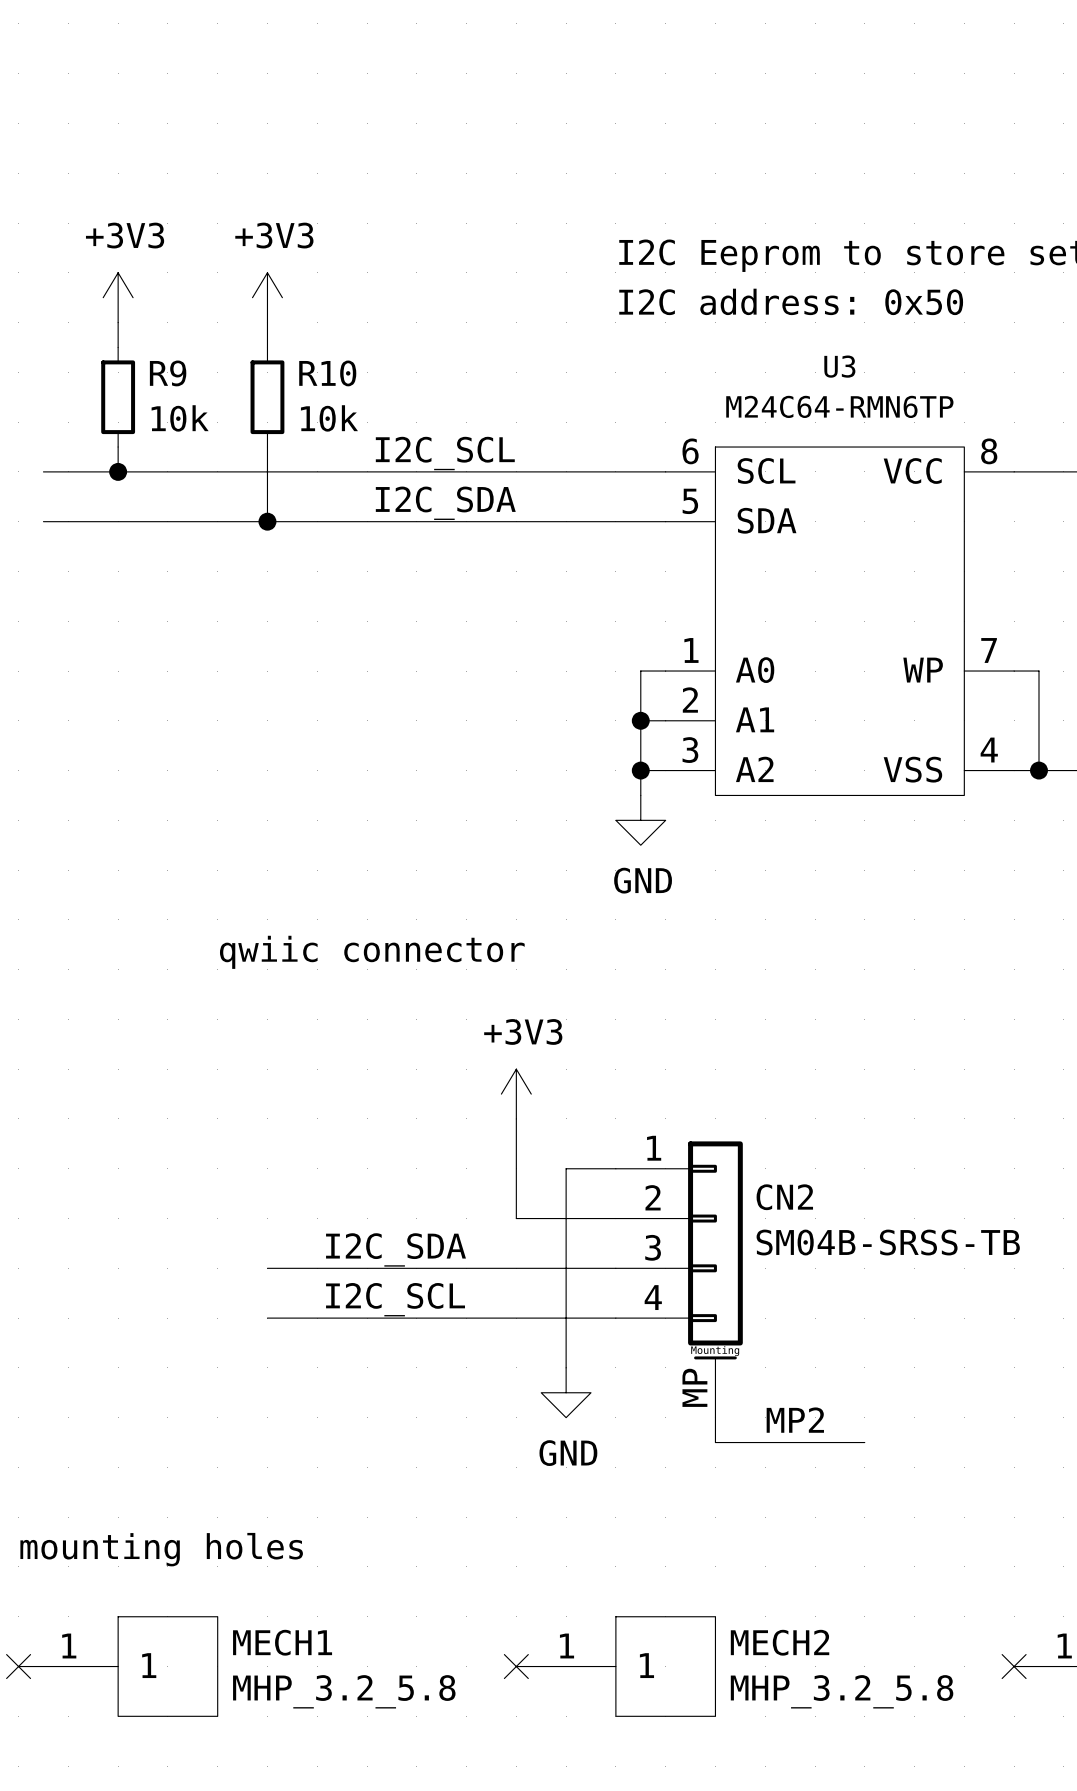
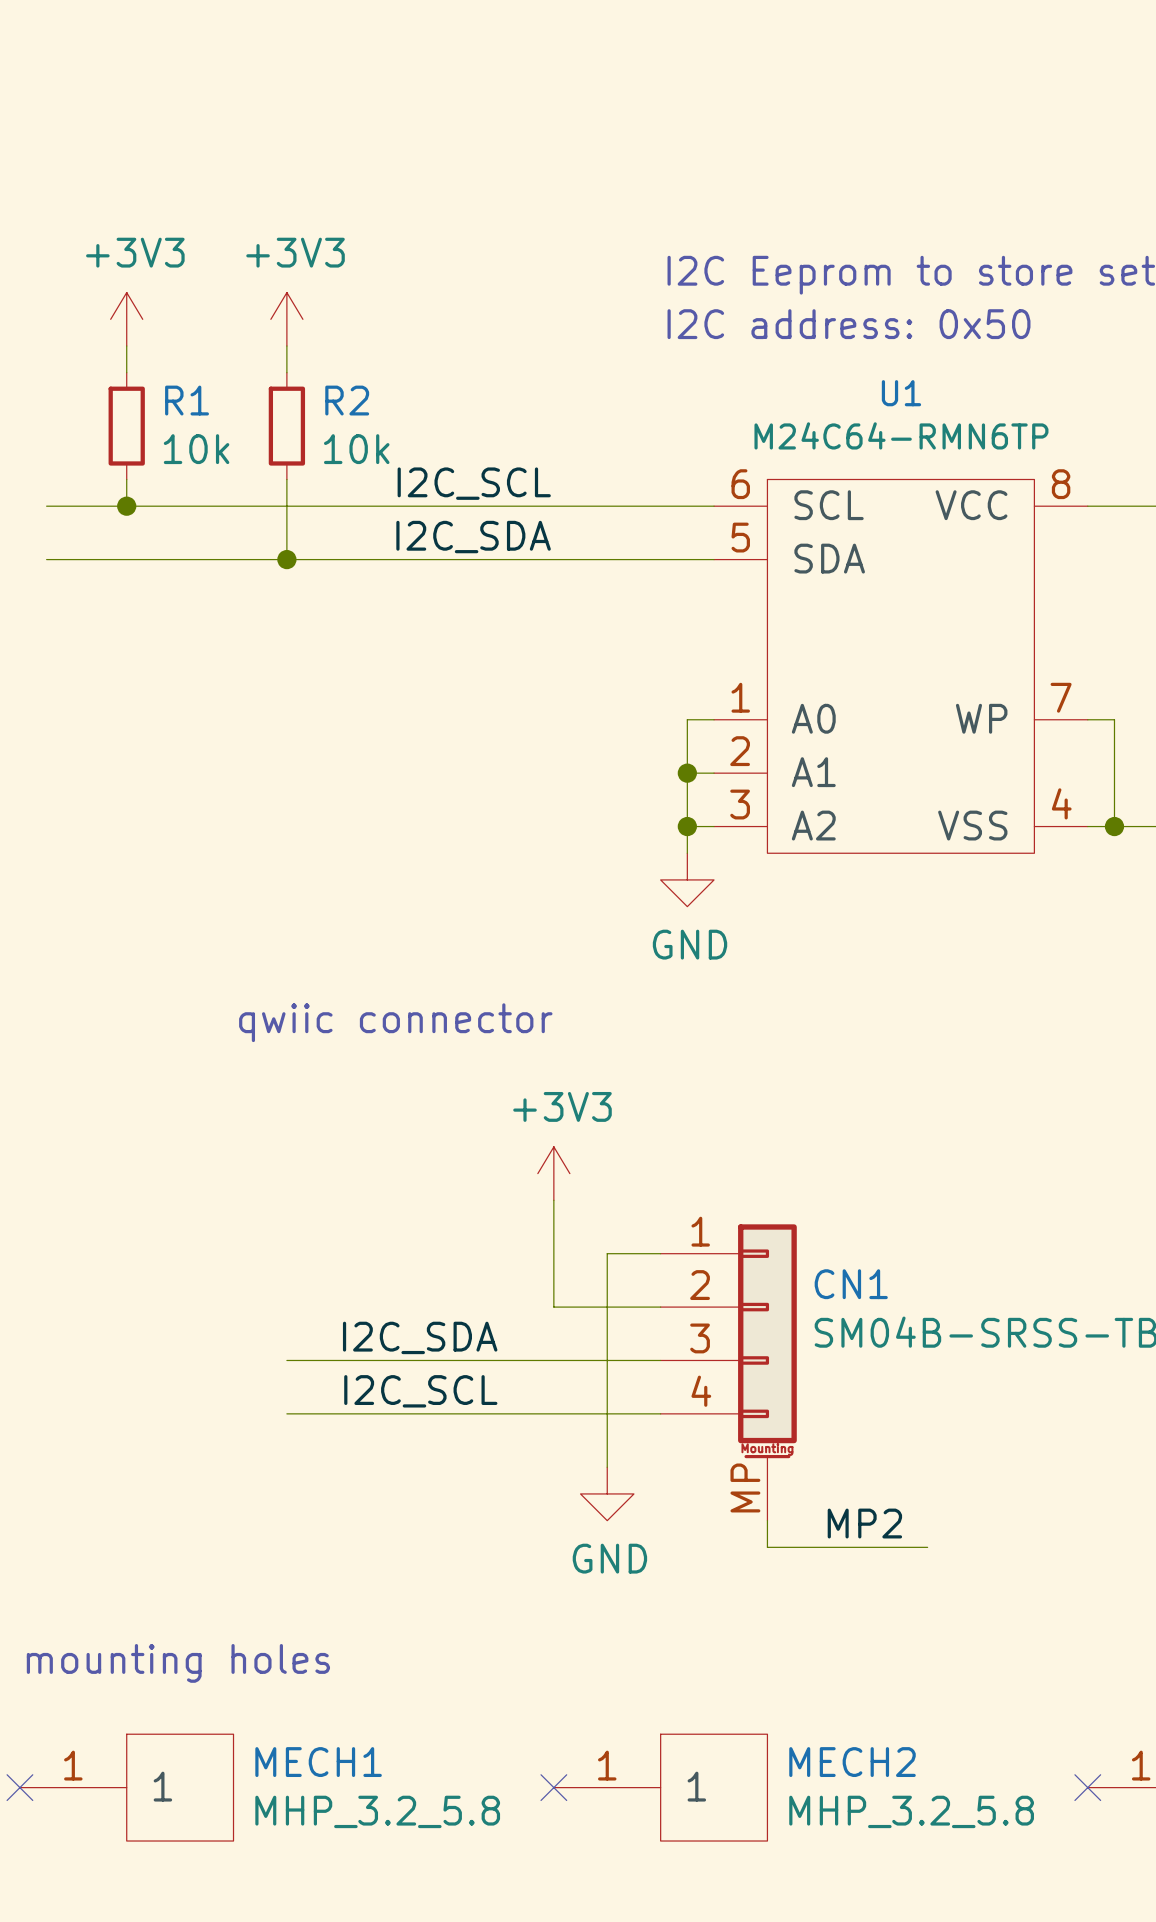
U3 name: U3 (839, 366) -> U1 (901, 393)
R9 name: R9 (168, 373) -> R1 (187, 400)
R10 name: R10 (327, 373) -> R2 (347, 400)
CN2 name: CN2 (784, 1197) -> CN1 (851, 1284)

